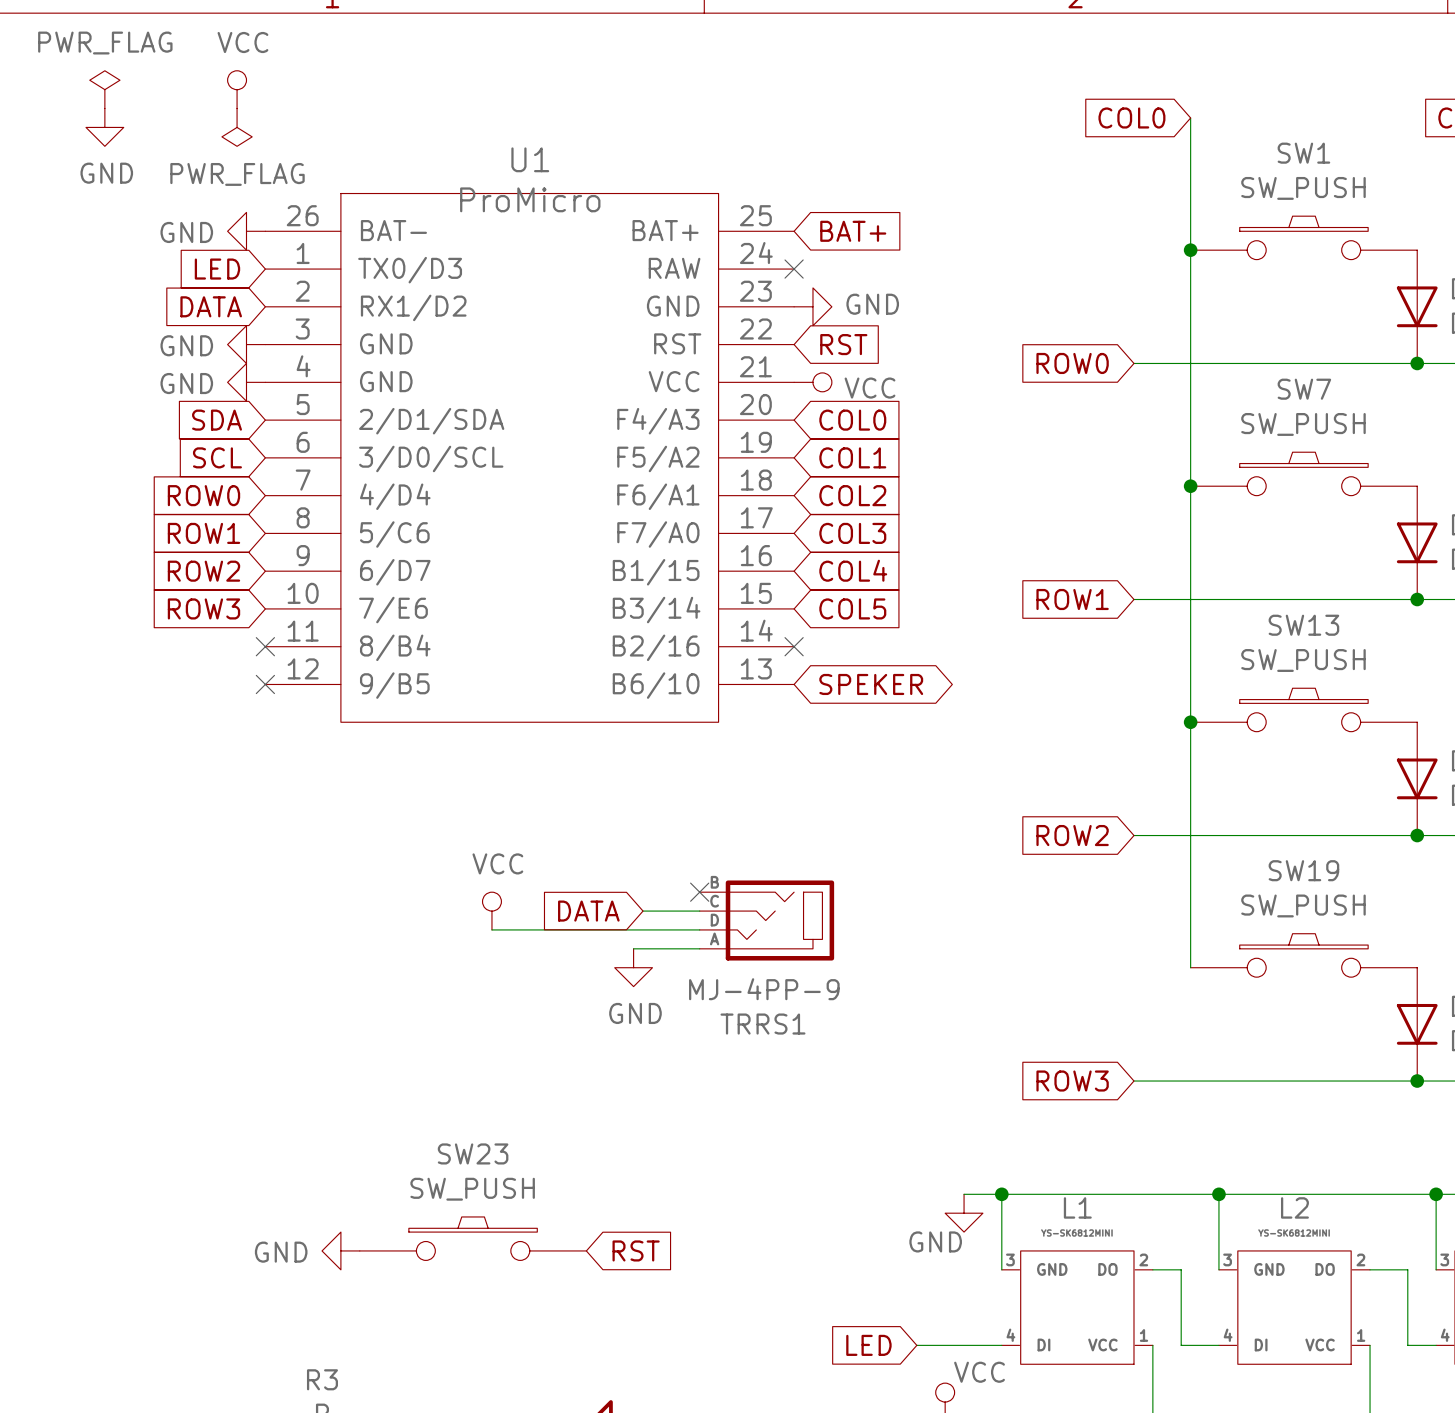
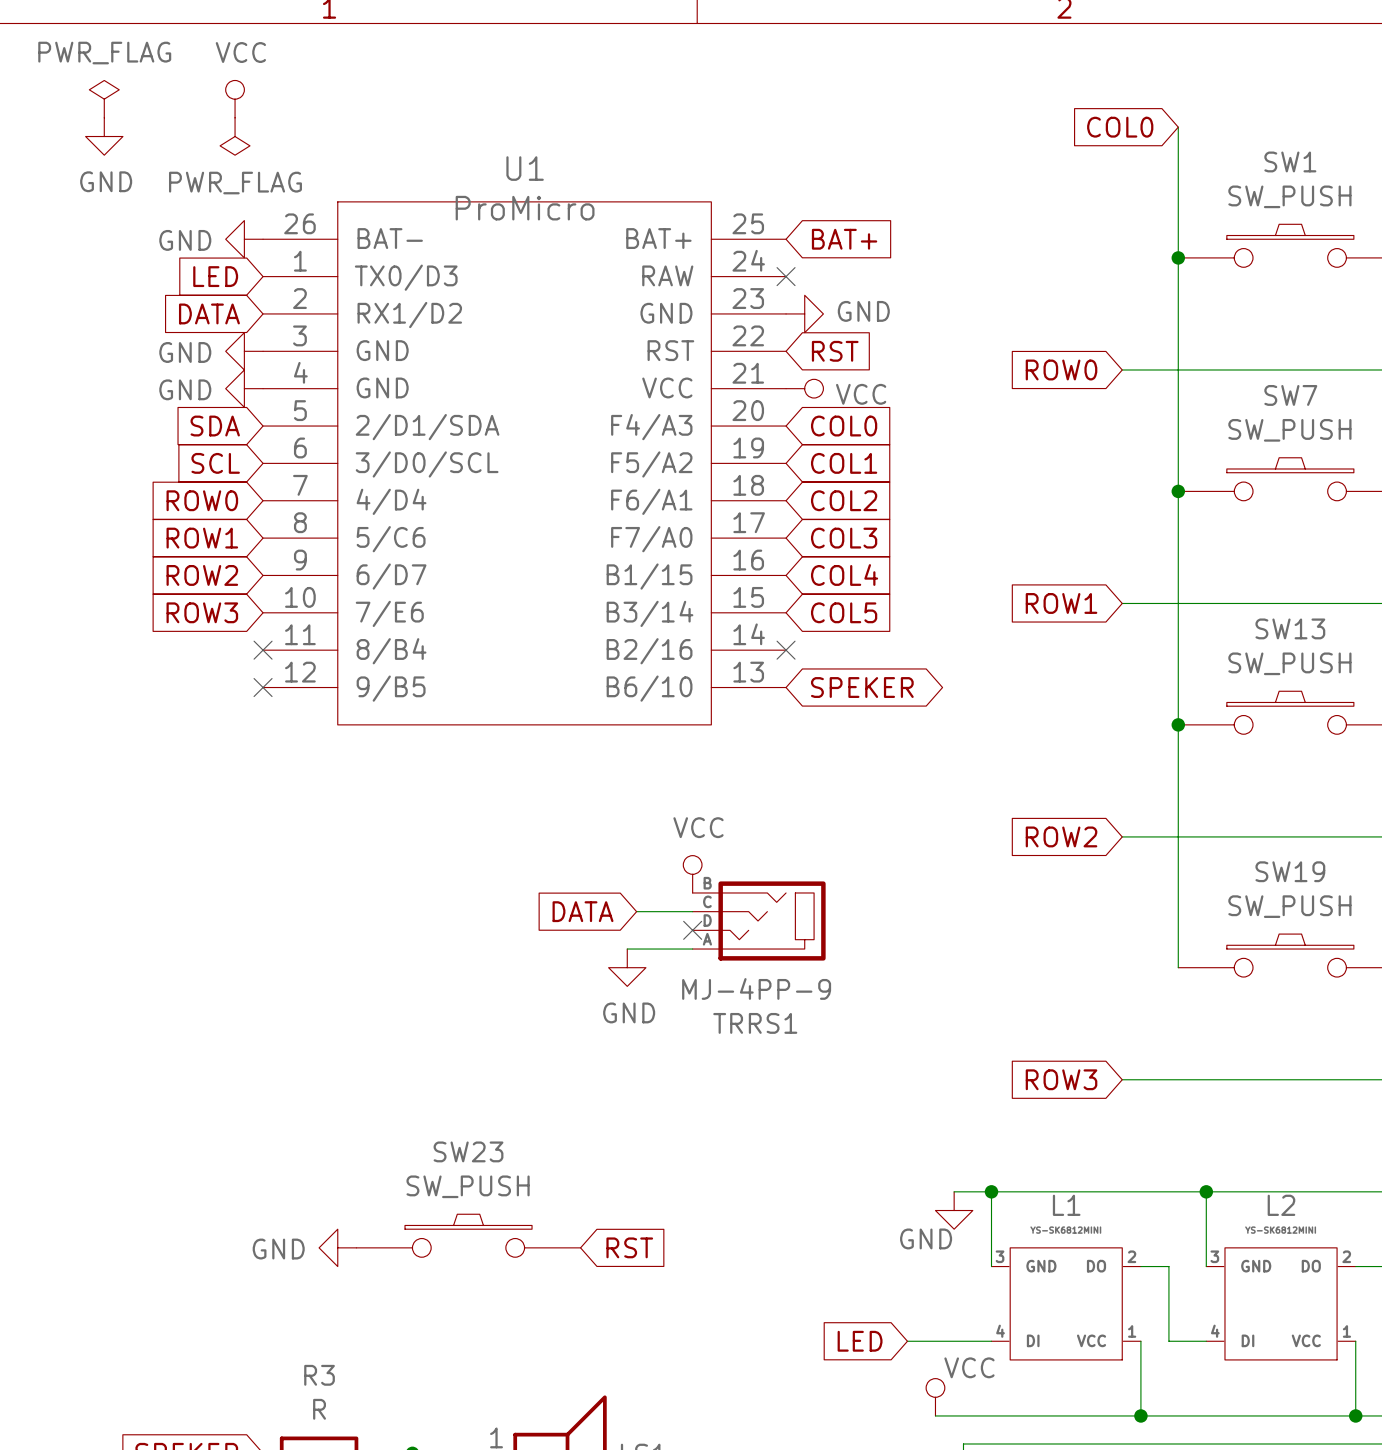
no-connect mark position: (699, 892) -> (692, 930)
power symbol position: VCC (491, 911) -> VCC (692, 874)
wire: (491, 929) (699, 929) -> none

